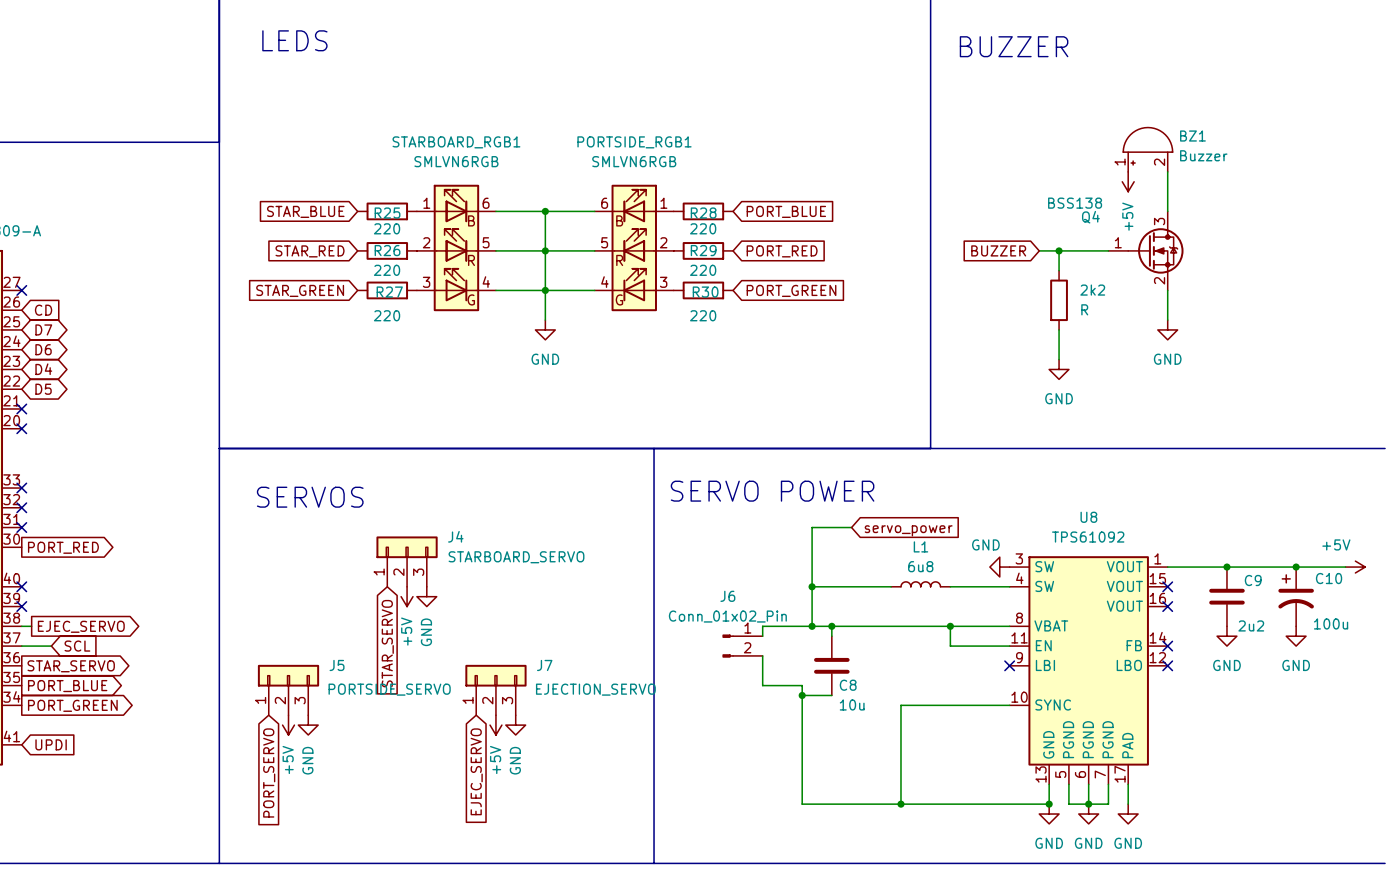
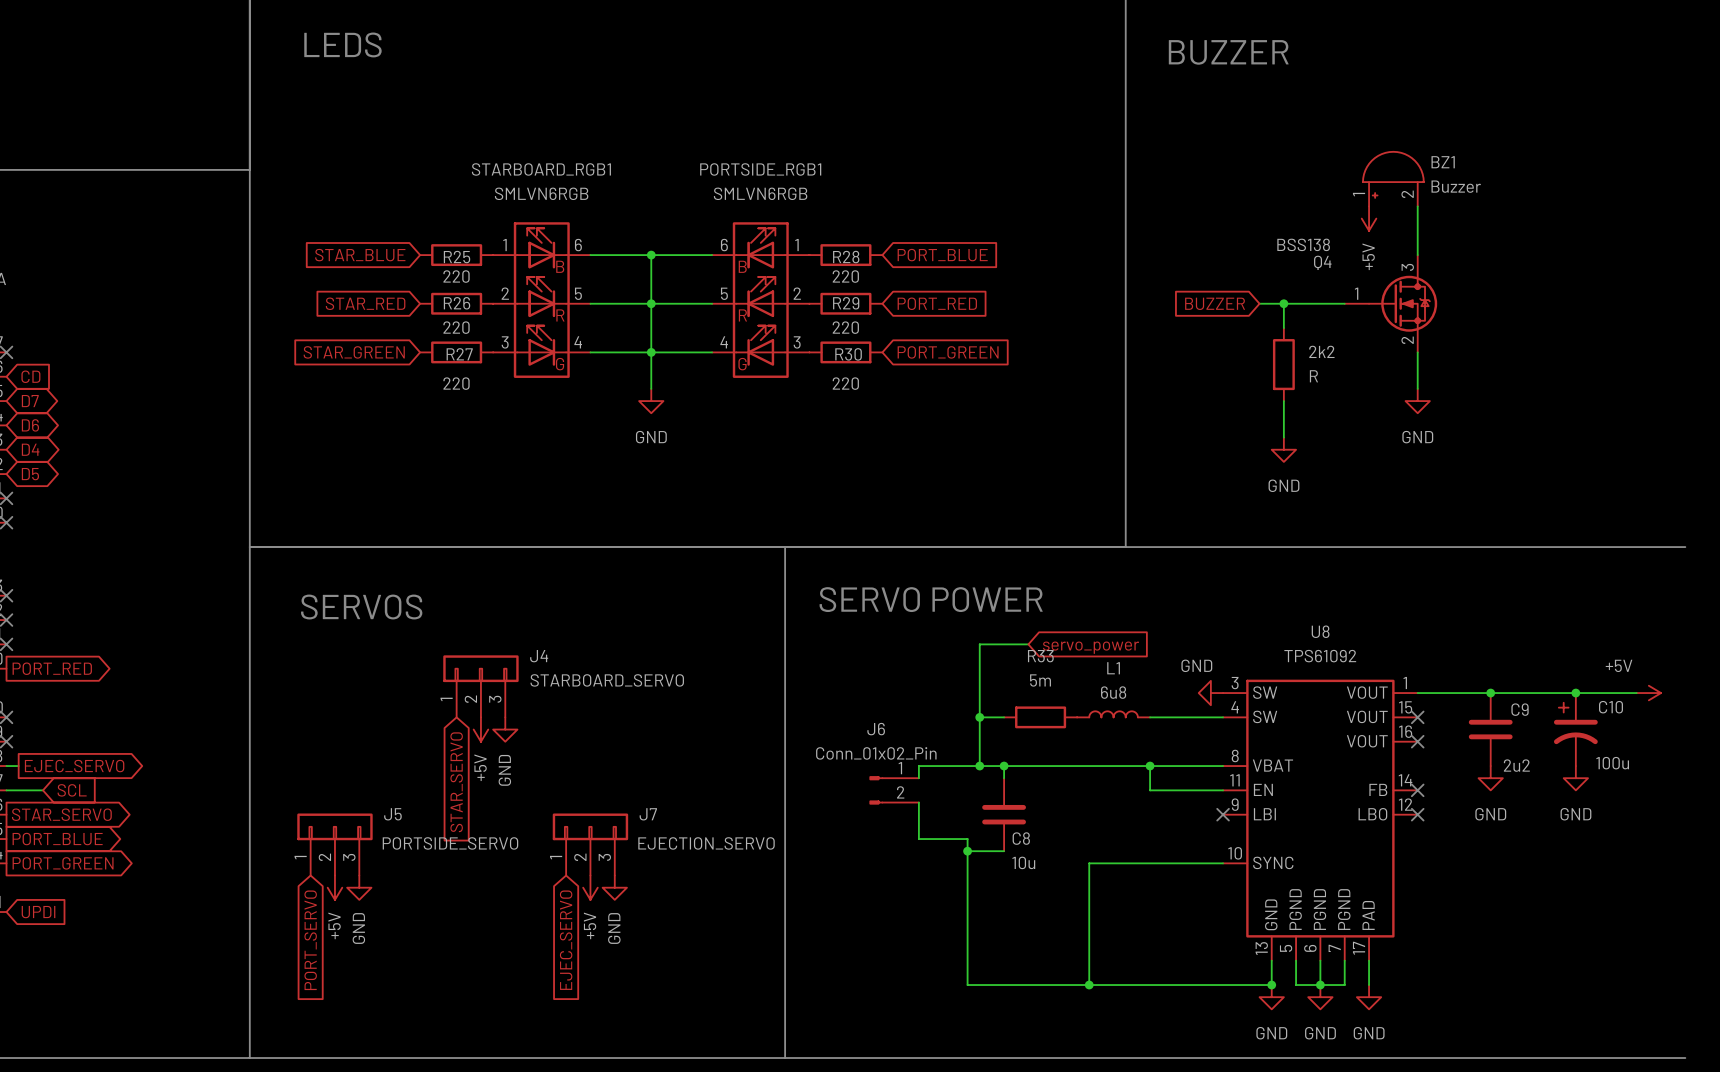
wire: (831, 586) (891, 586) -> none
R33: none -> 5m (1040, 717)

